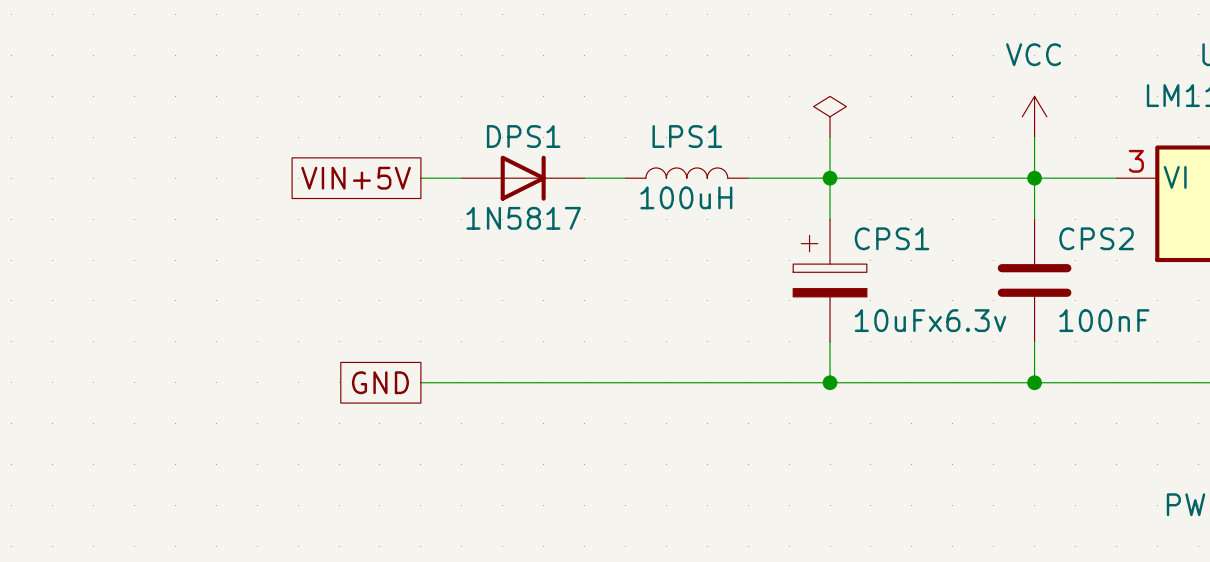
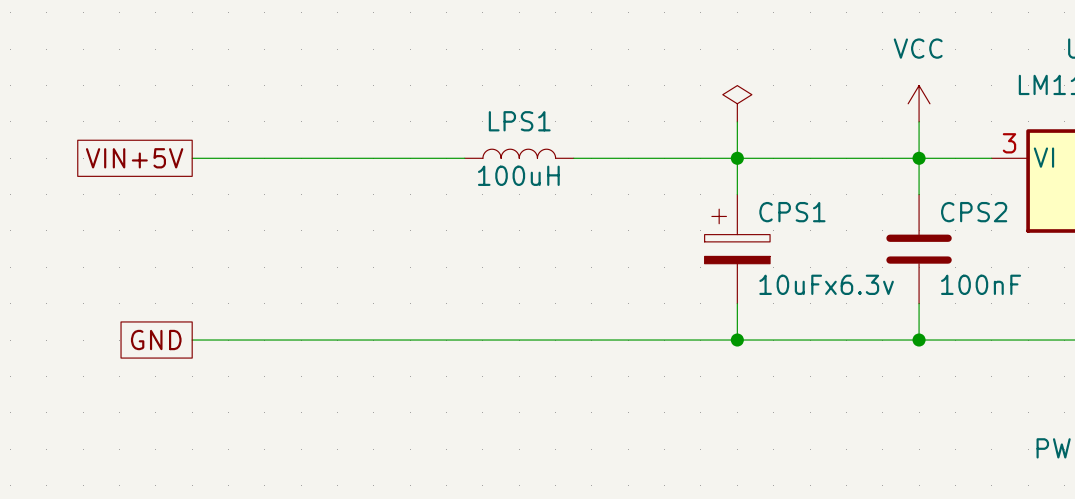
LPS1 position: (686, 173) -> (519, 153)
wire: none -> (192, 158) (373, 158)
global label position: VIN+5V (356, 178) -> VIN+5V (134, 158)
DPS1: 1N5817 (523, 178) -> none
wire: (584, 178) (625, 178) -> none
wire: none -> (573, 158) (664, 158)
wire: none -> (192, 340) (373, 340)
global label position: GND (380, 382) -> GND (156, 340)

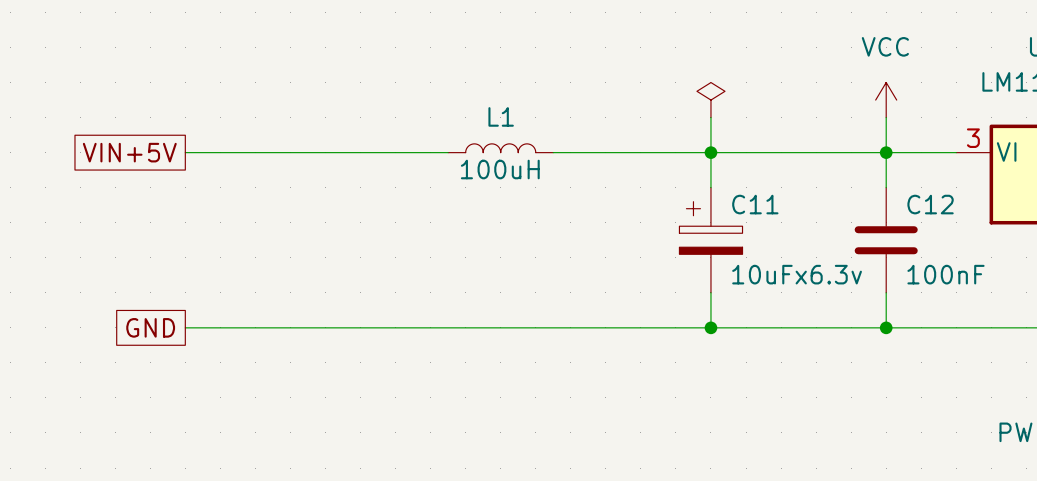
LPS1 name: LPS1 (519, 121) -> L1 (501, 116)
CPS1 name: CPS1 (792, 212) -> C11 (755, 204)
CPS2 name: CPS2 (974, 212) -> C12 (930, 204)

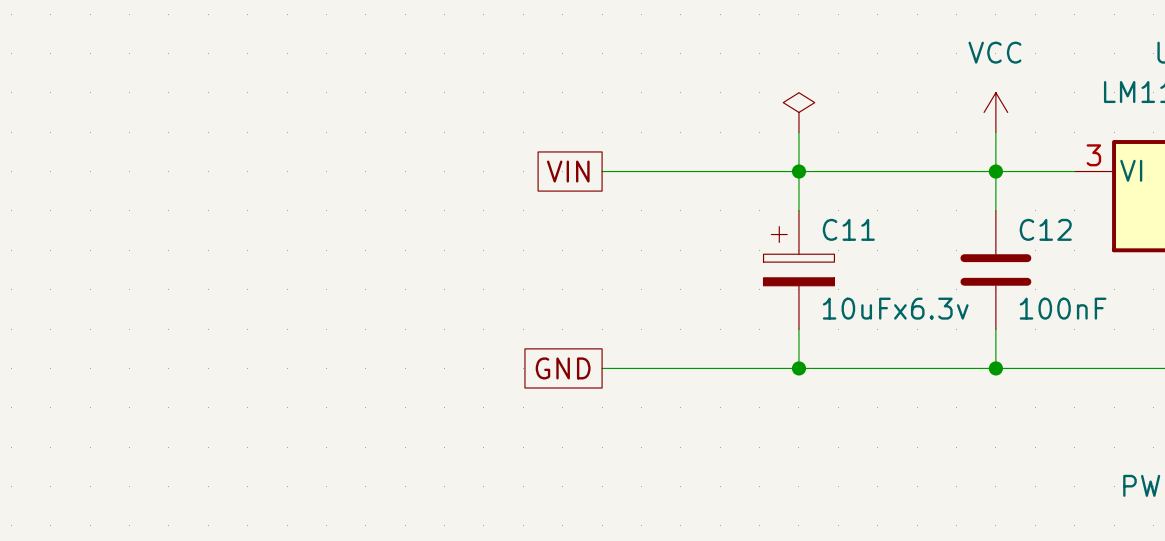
L1: 100uH (500, 148) -> none
global label: VIN+5V (129, 152) -> none
wire: (185, 152) (448, 152) -> none
global label: none -> VIN (568, 171)
global label: GND (150, 327) -> none
wire: (185, 327) (535, 327) -> none
global label: none -> GND (563, 368)

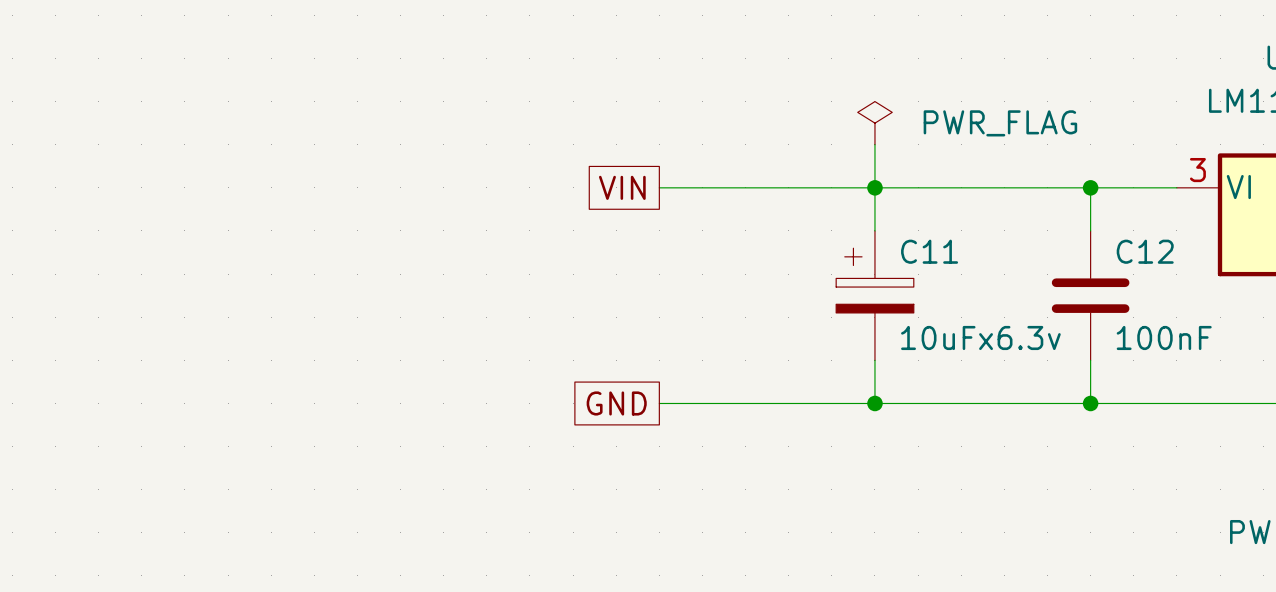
power symbol text: none -> PWR_FLAG (1000, 123)
power symbol: VCC (995, 112) -> none
wire: (995, 132) (995, 171) -> none

